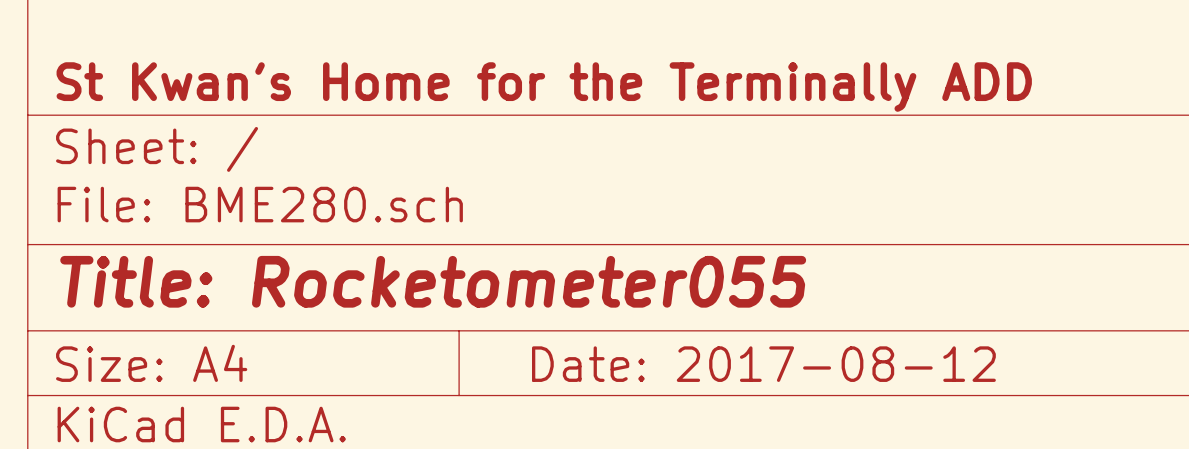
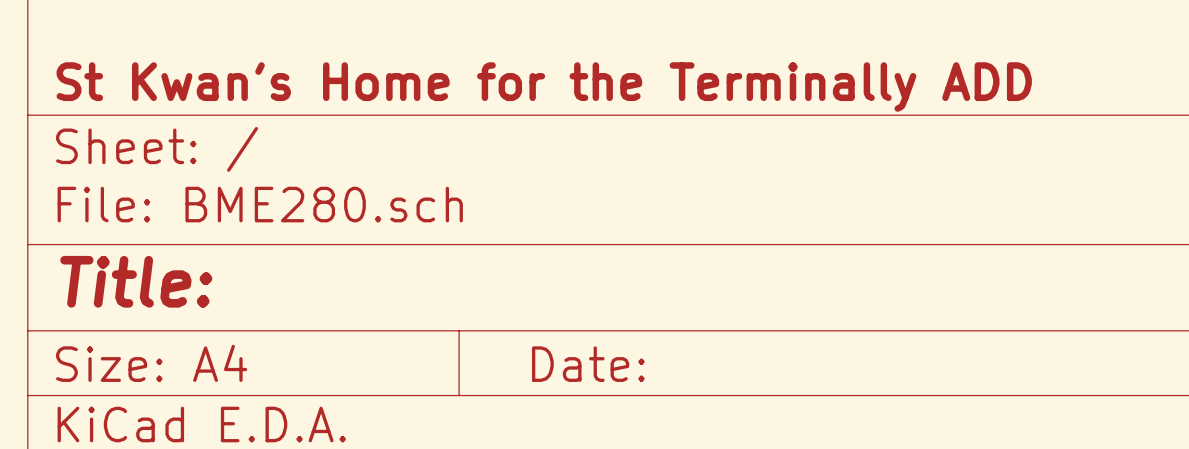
title block: Title: Rocketometer055 (433, 281) -> Title: (136, 281)
title block: Date: 2017-08-12 (763, 364) -> Date: (588, 364)

